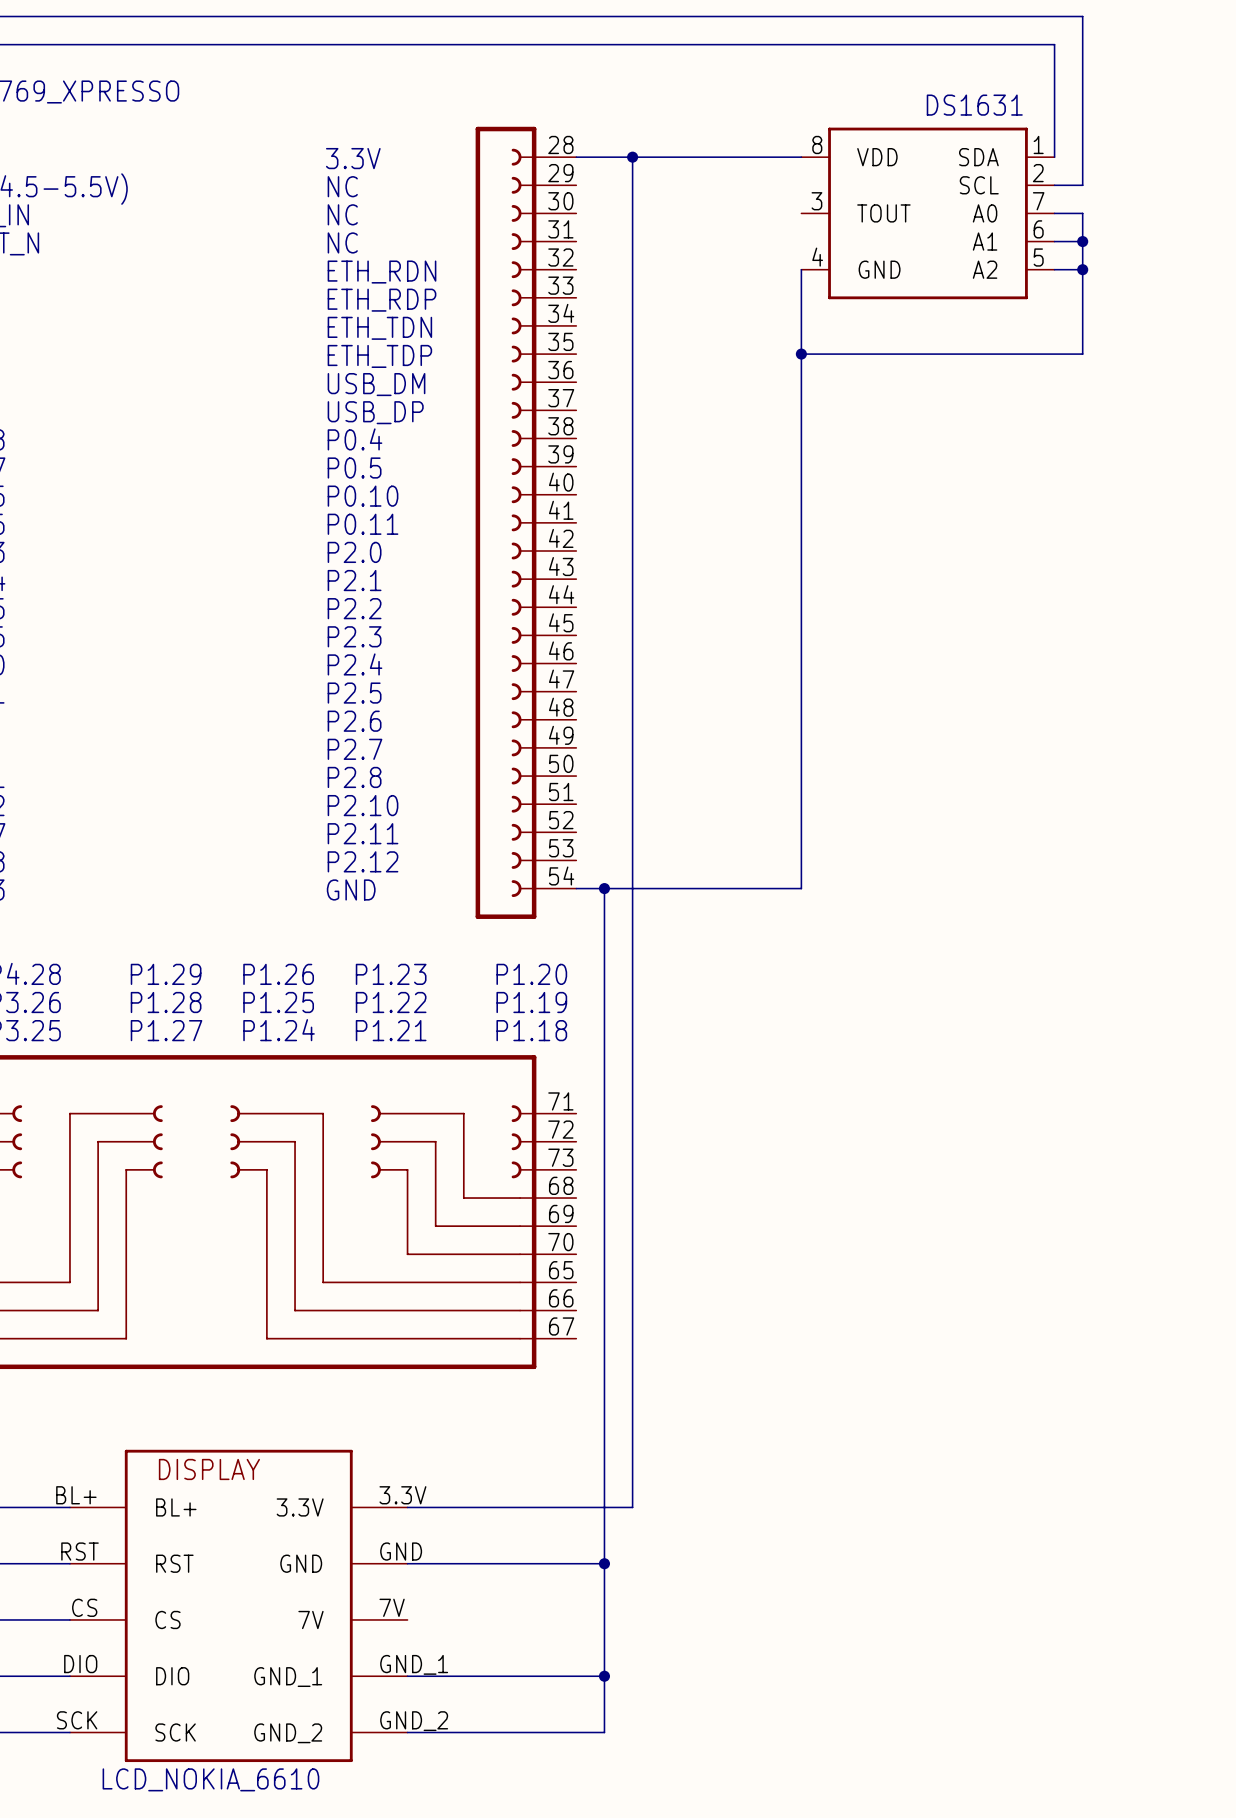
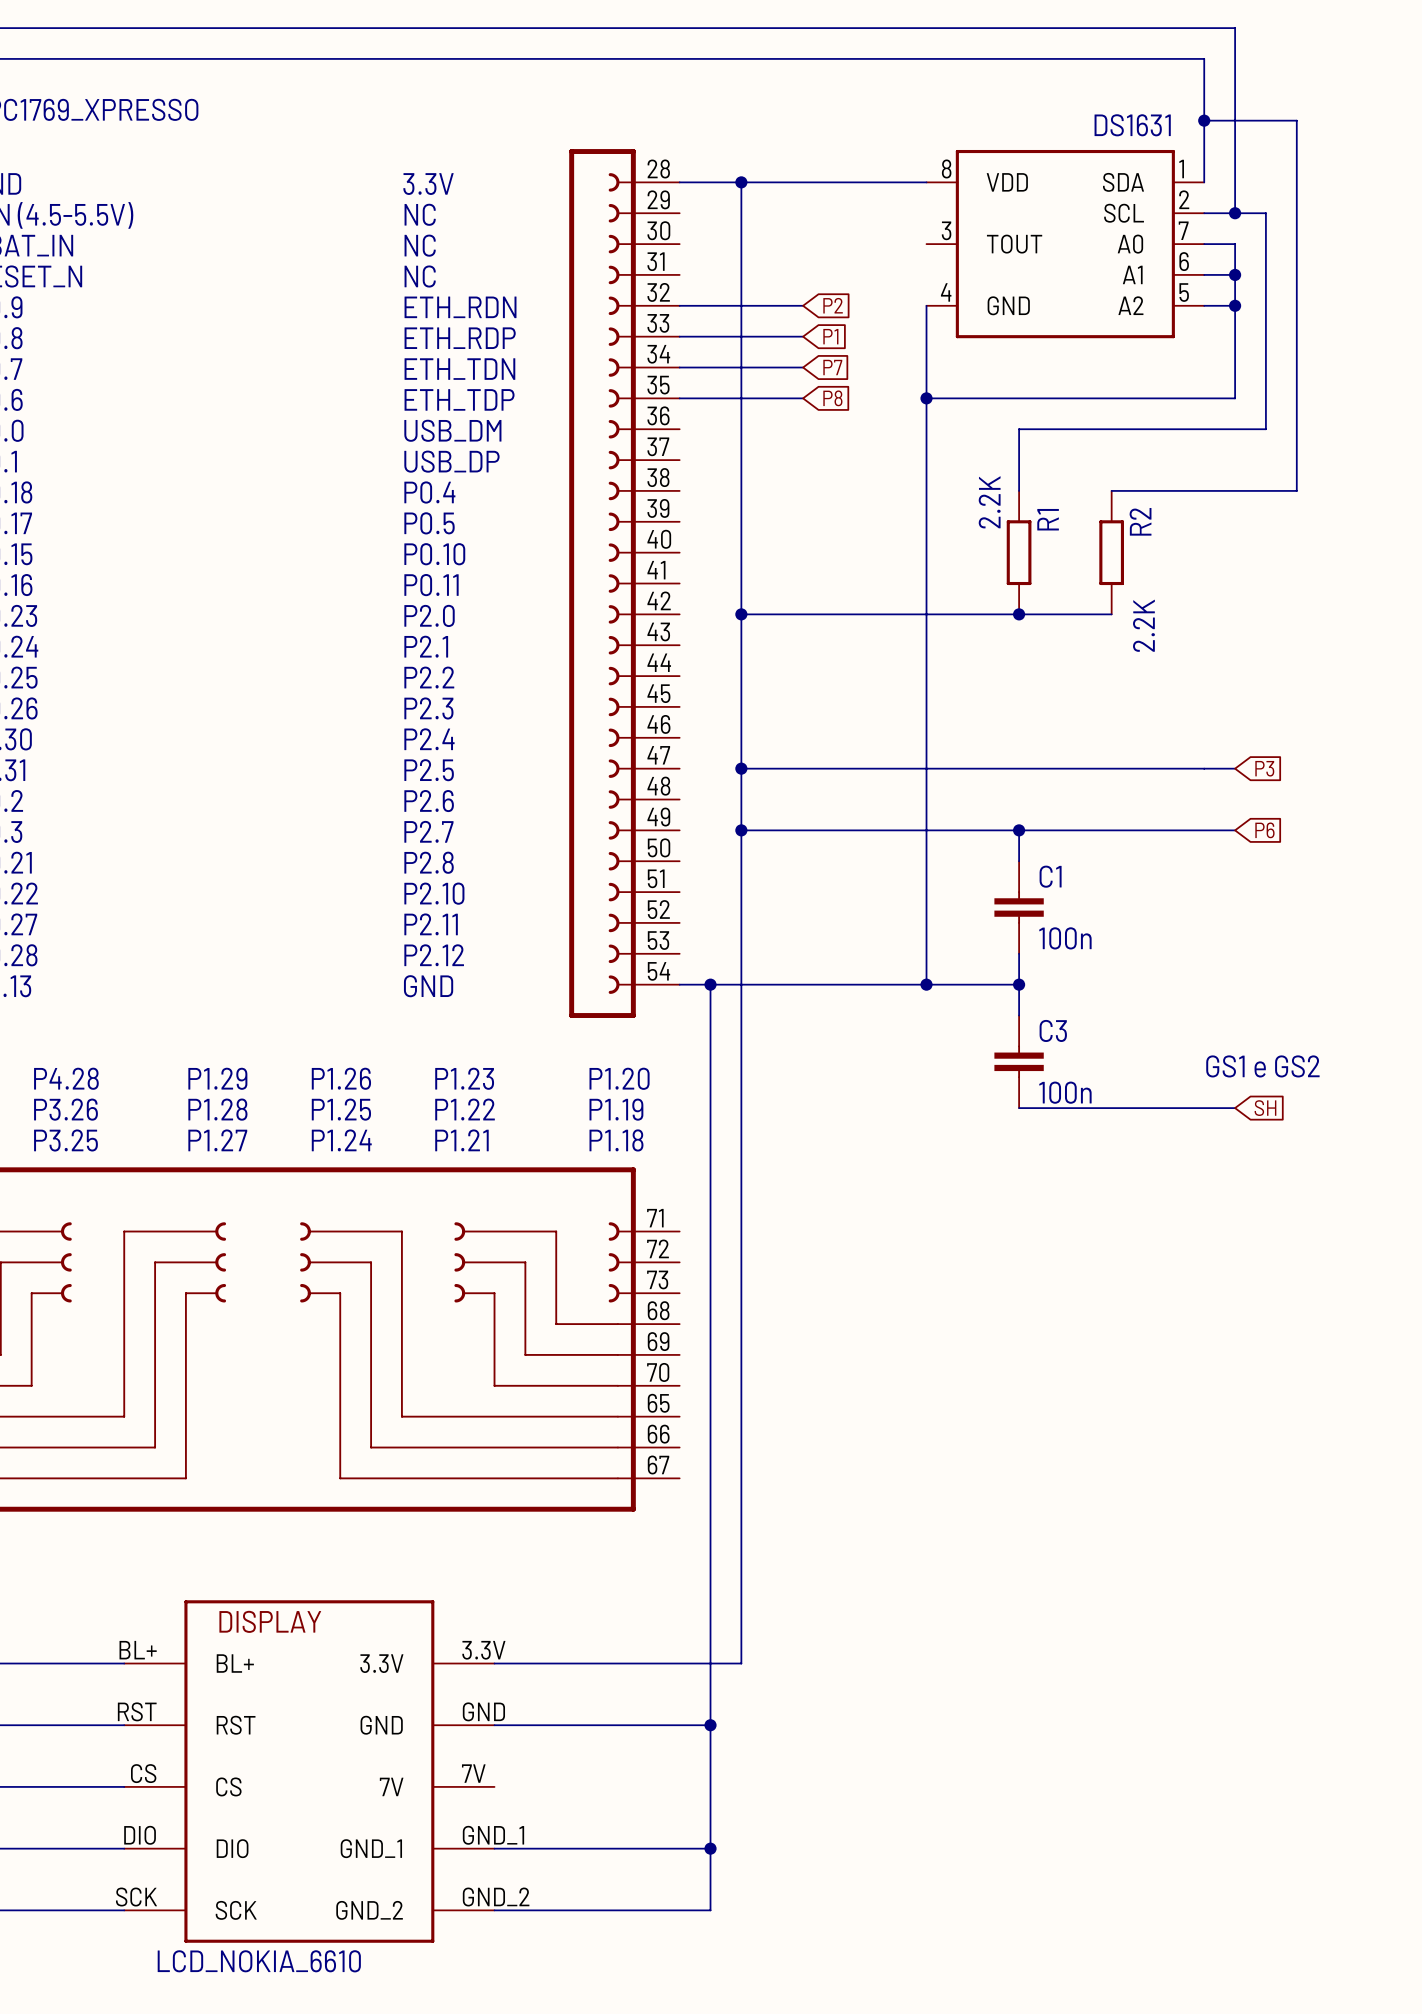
wire: none -> (1204, 120) (1296, 120) (1296, 490) (1111, 490)
junction: none -> (1204, 120)
wire: none -> (1235, 213) (1265, 213) (1265, 429) (1019, 429) (1019, 490)
junction: none -> (1235, 213)
wire: none -> (679, 305) (803, 305)
global label: none -> P2 (833, 305)
wire: none -> (679, 336) (803, 336)
global label: none -> P1 (830, 336)
wire: none -> (679, 367) (803, 367)
global label: none -> P7 (832, 367)
wire: none -> (679, 398) (803, 398)
global label: none -> P8 (832, 398)
R1: none -> 2.2K (1019, 552)
R2: none -> 2.2K (1111, 552)
wire: none -> (741, 614) (1111, 614)
junction: none -> (741, 614)
junction: none -> (1019, 614)
wire: none -> (741, 768) (1235, 768)
junction: none -> (741, 768)
global label: none -> P3 (1264, 768)
wire: none -> (741, 830) (1235, 830)
junction: none -> (741, 830)
wire: none -> (1019, 830) (1019, 861)
junction: none -> (1019, 830)
global label: none -> P6 (1264, 830)
C1: none -> 100n (1019, 907)
wire: none -> (1019, 953) (1019, 1015)
wire: none -> (926, 984) (1019, 984)
junction: none -> (926, 984)
junction: none -> (1019, 984)
C3: none -> 100n (1019, 1061)
text: none -> GS1 e GS2 (1262, 1066)
wire: none -> (1019, 1108) (1235, 1108)
global label: none -> SH (1265, 1108)

